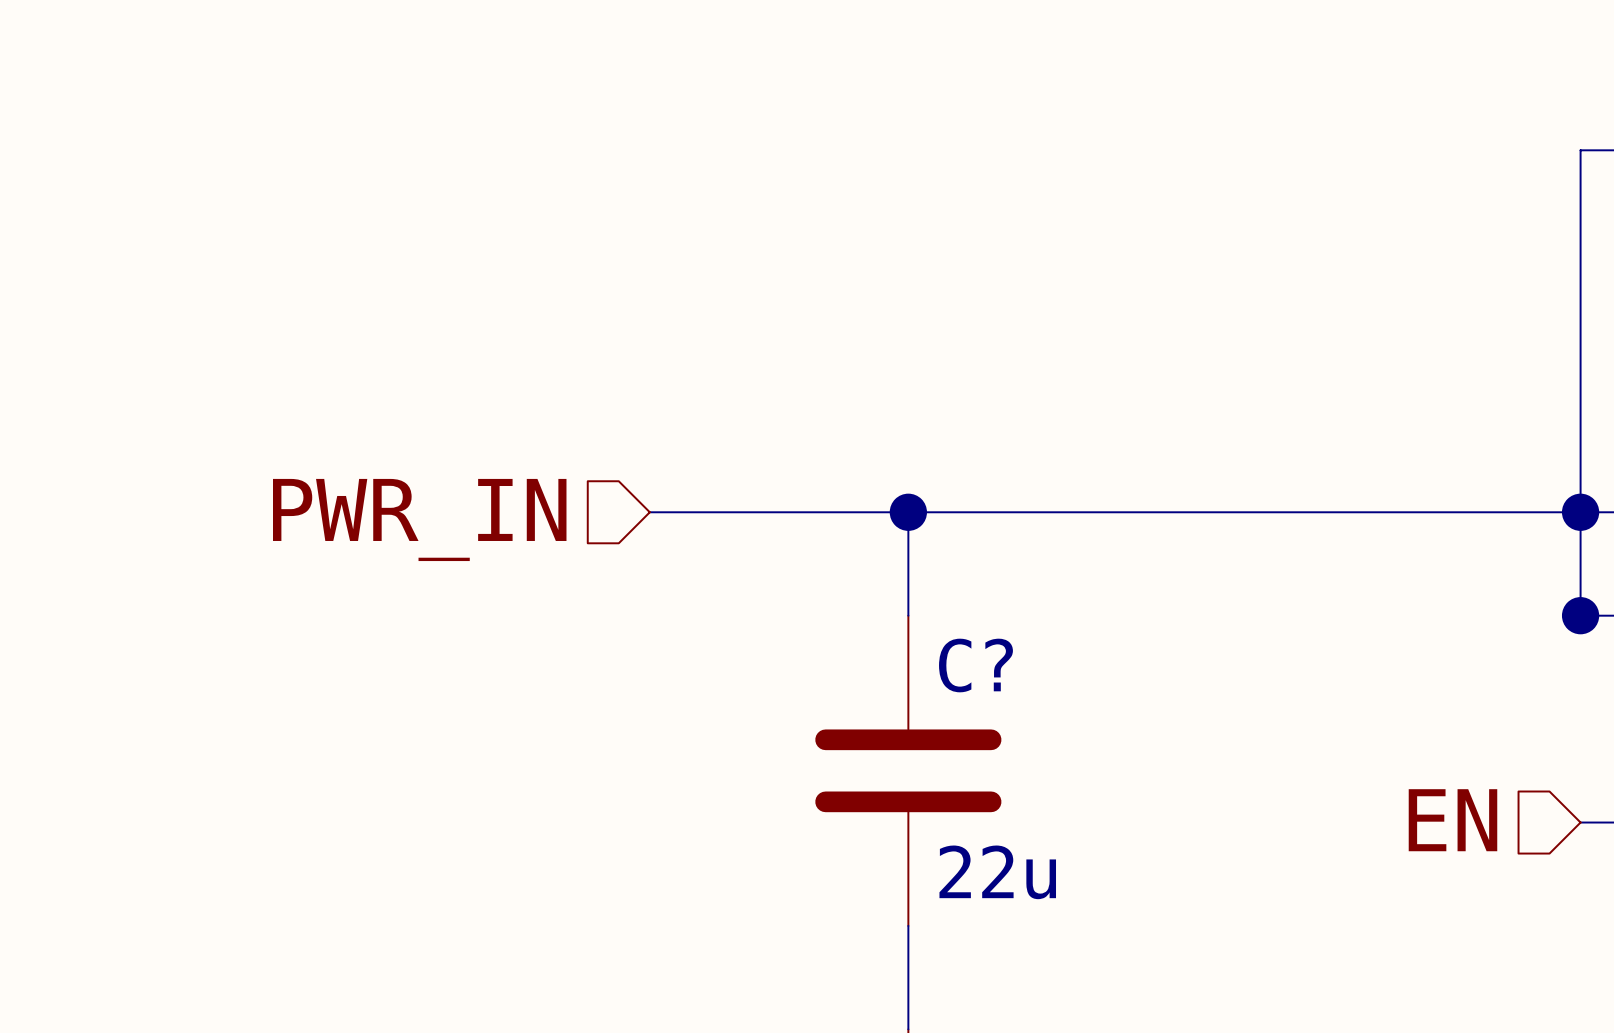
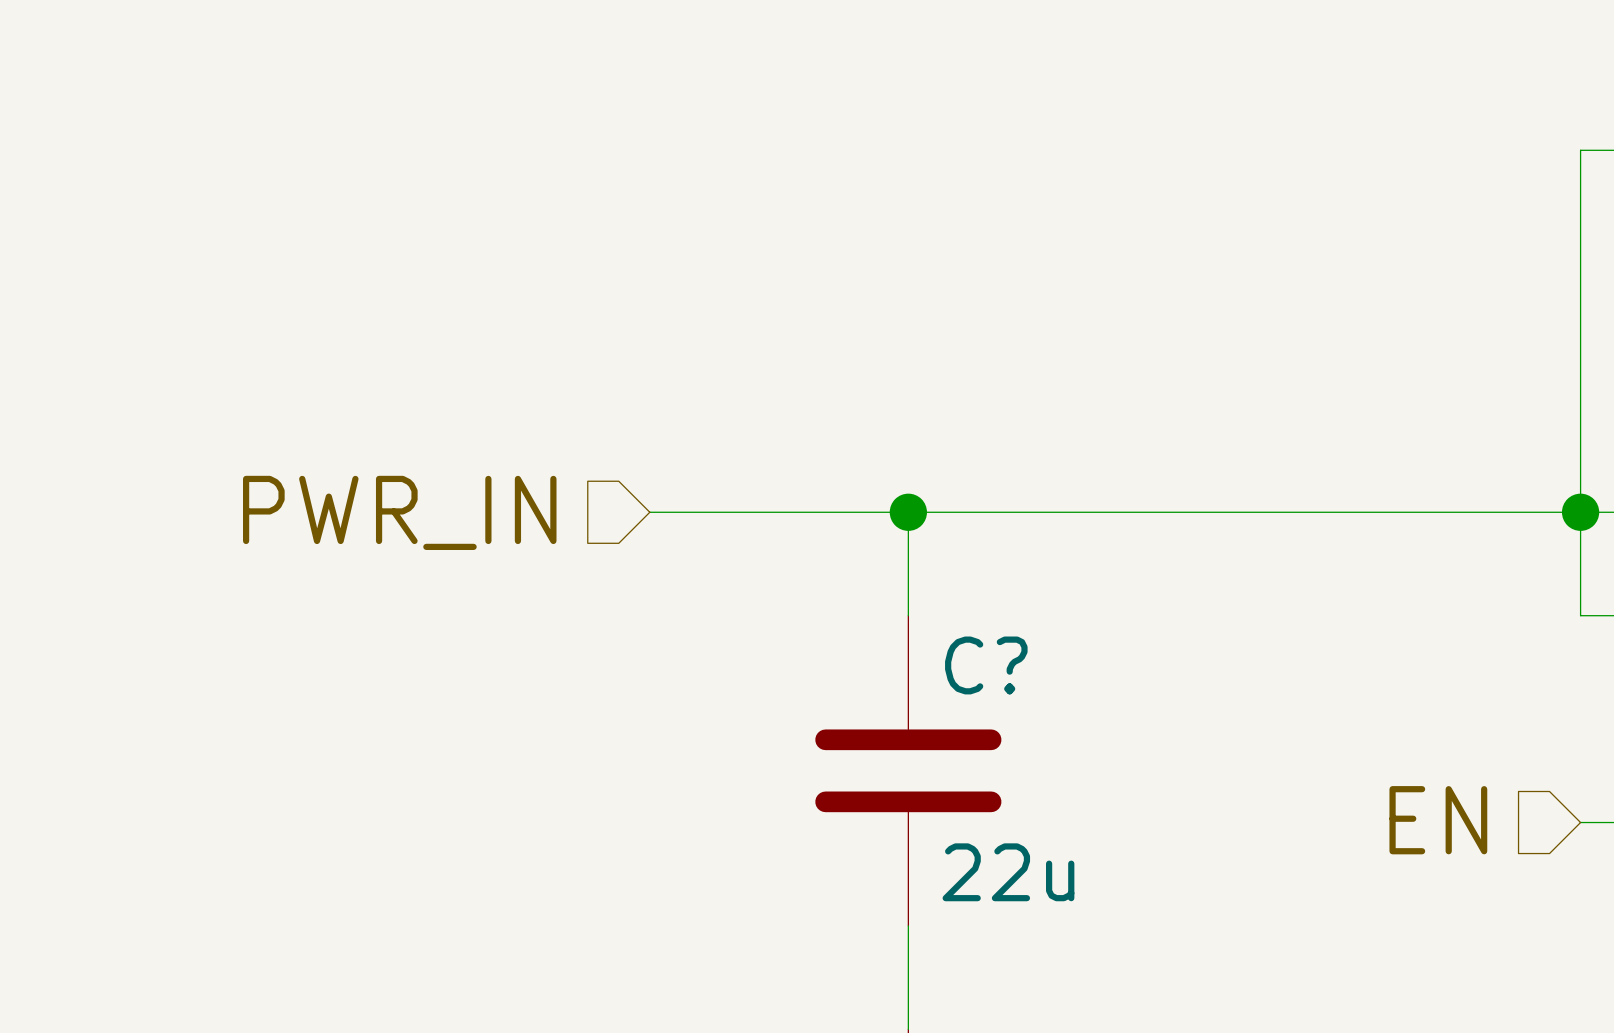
junction: (1580, 615) -> none

